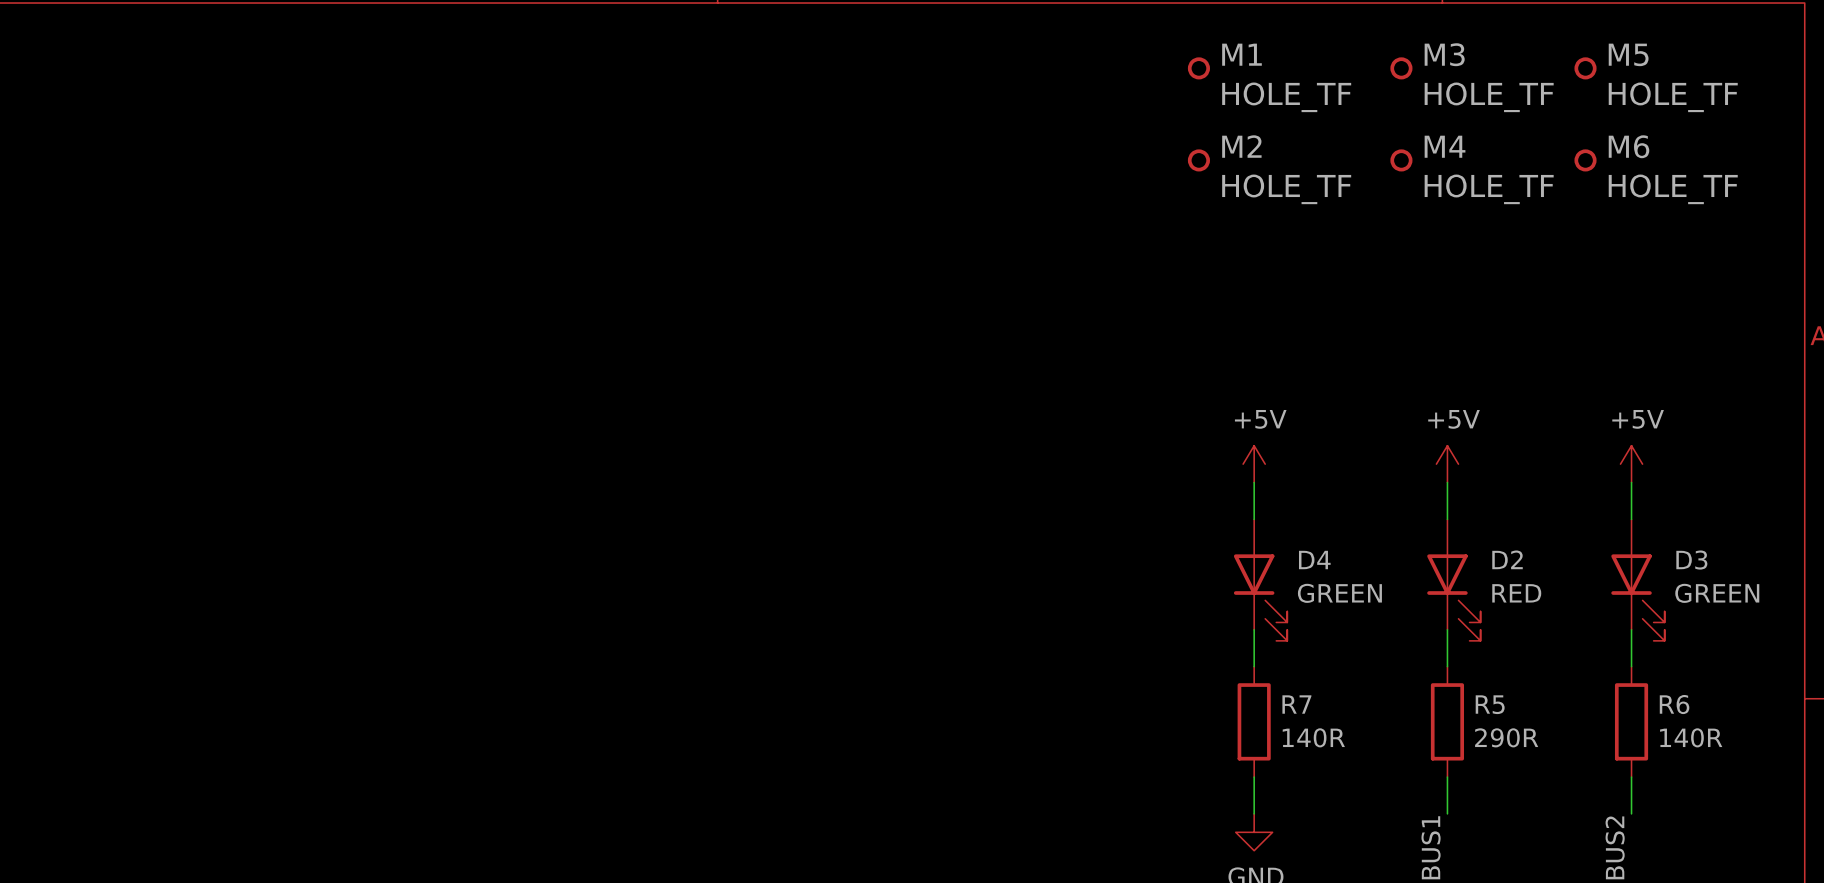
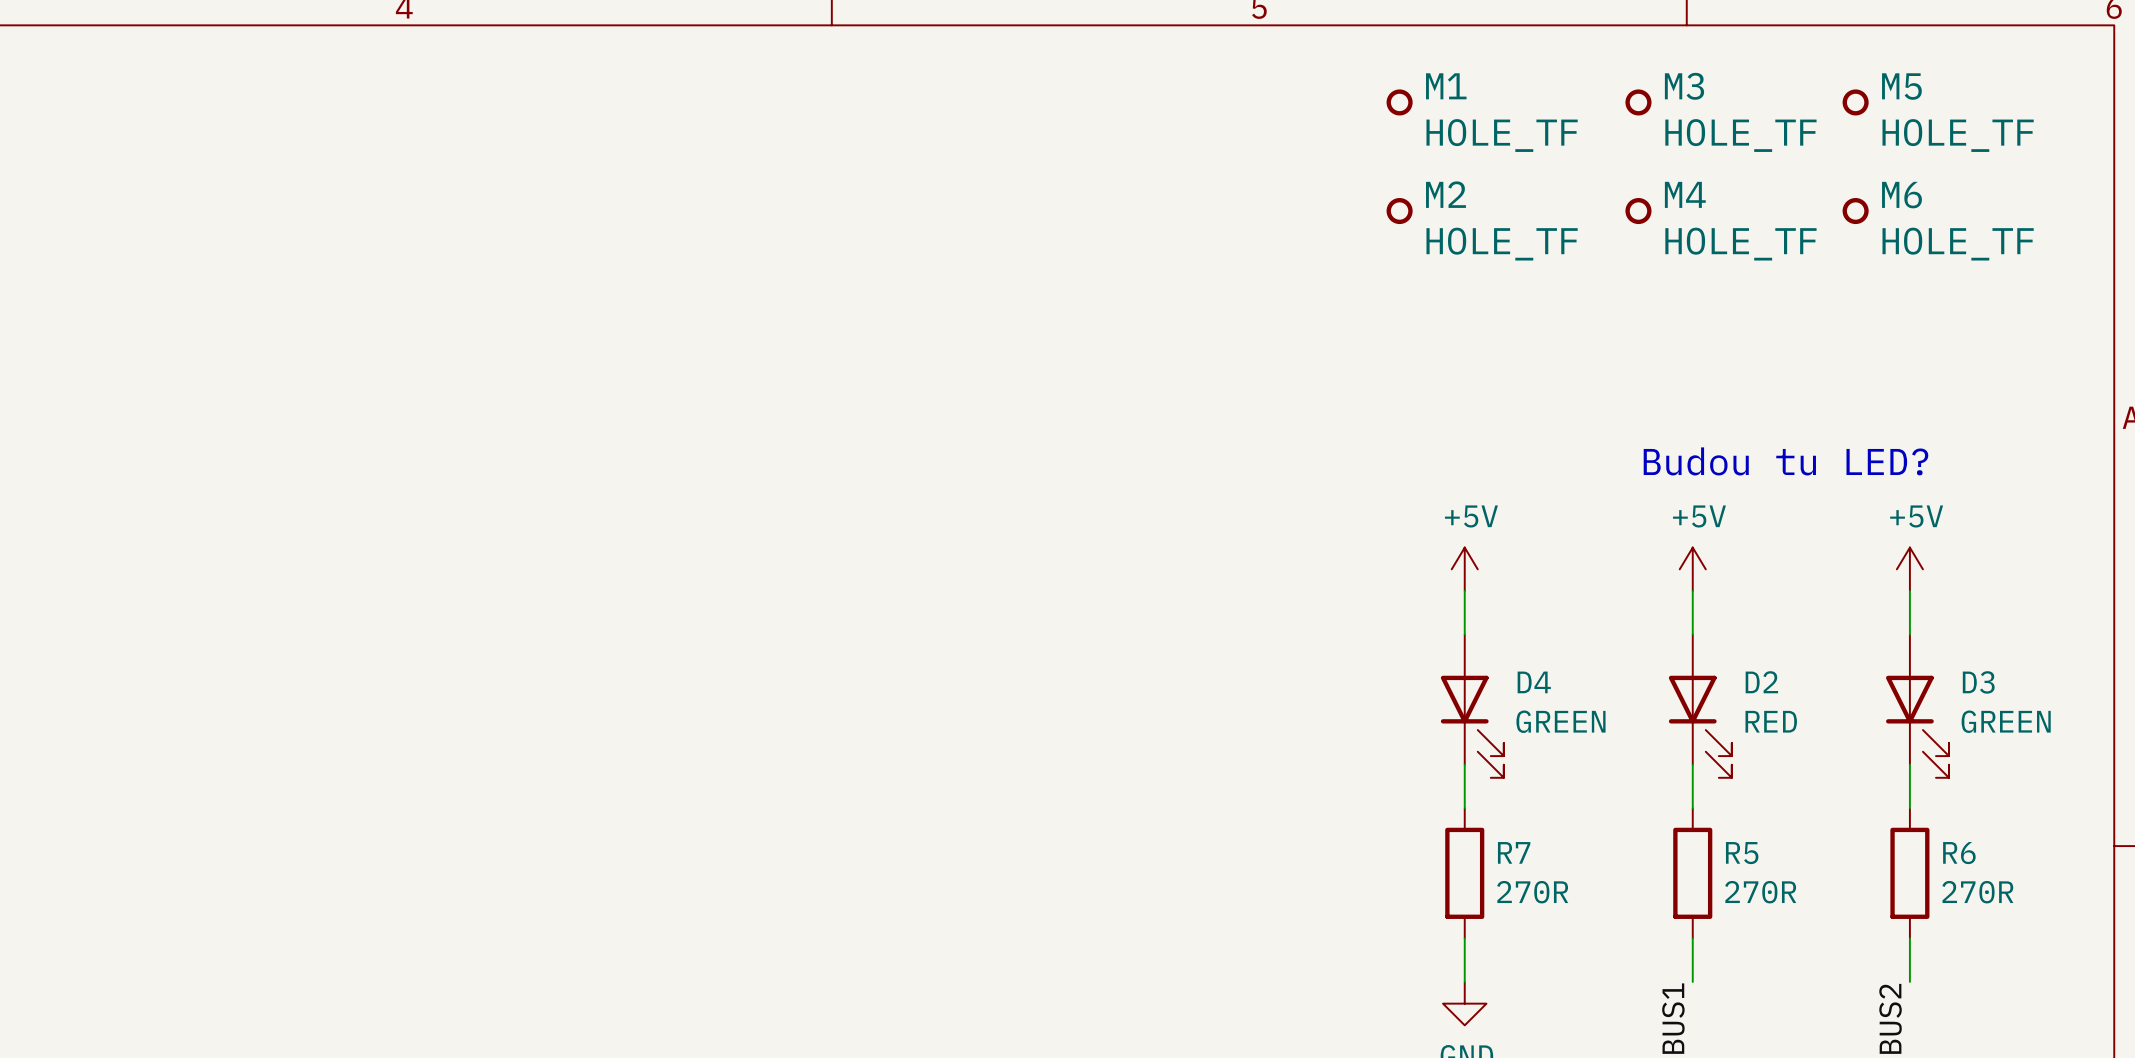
text: none -> Budou tu LED? (1785, 461)
R7 value: 140R (1313, 737) -> 270R (1532, 892)
R5 value: 290R (1506, 737) -> 270R (1760, 892)
R6 value: 140R (1691, 737) -> 270R (1977, 892)

